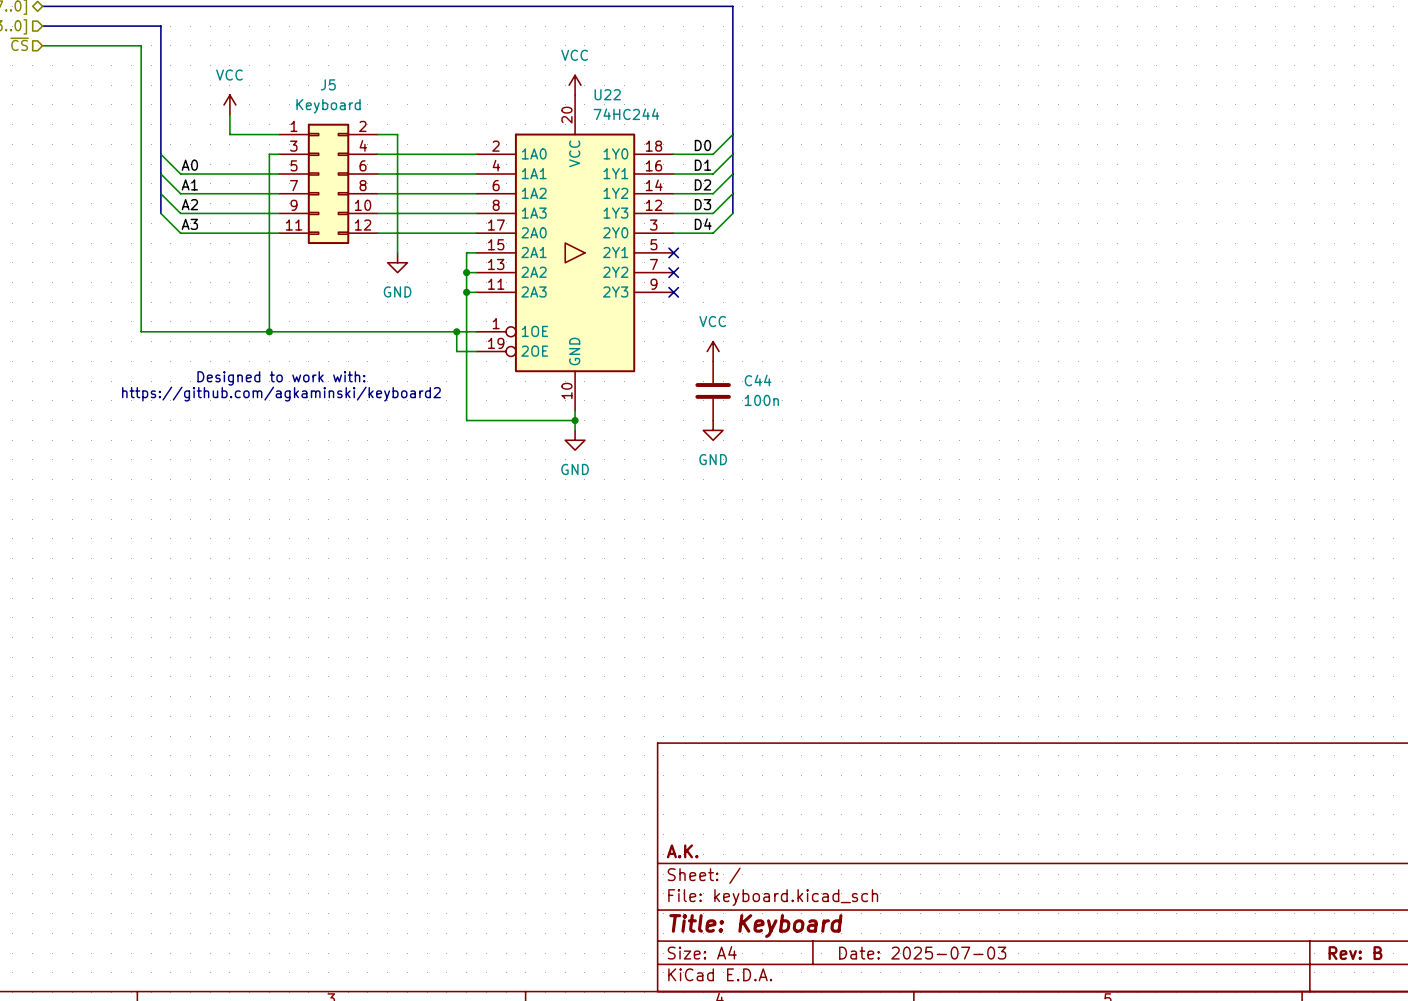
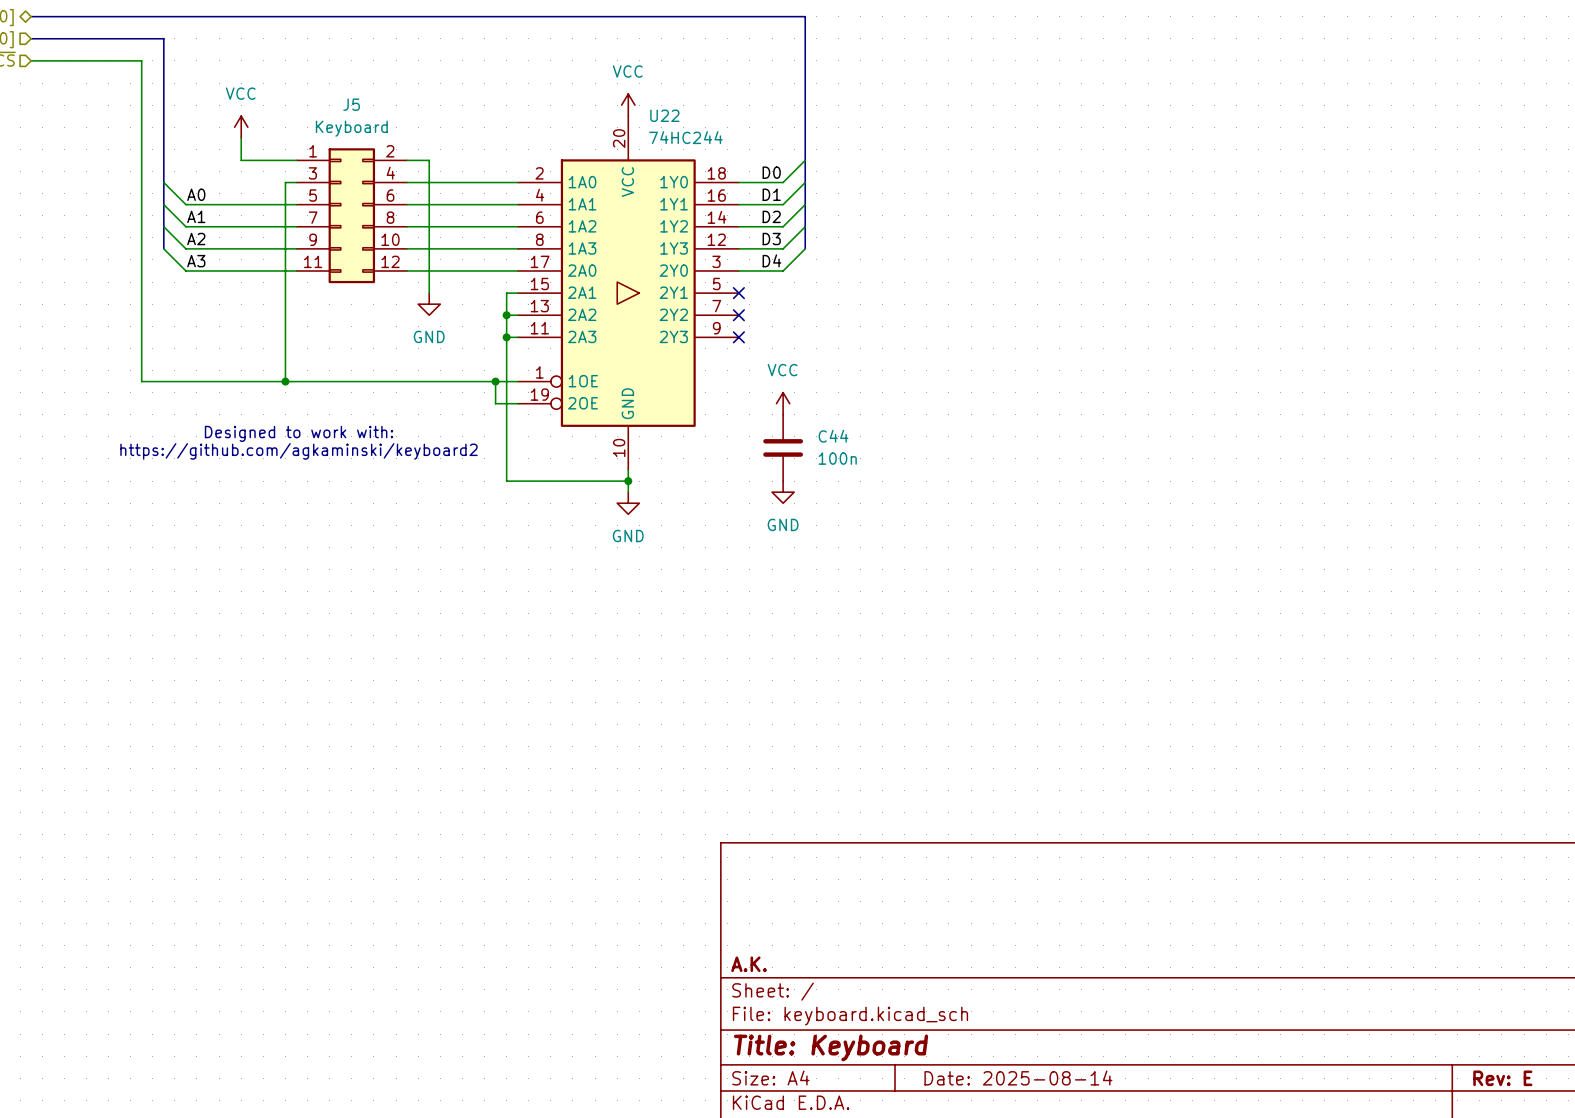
title block: Date: 2025-07-03 (922, 953) -> Date: 2025-08-14 (1018, 1078)
title block: Rev: B (1355, 953) -> Rev: E (1502, 1078)

